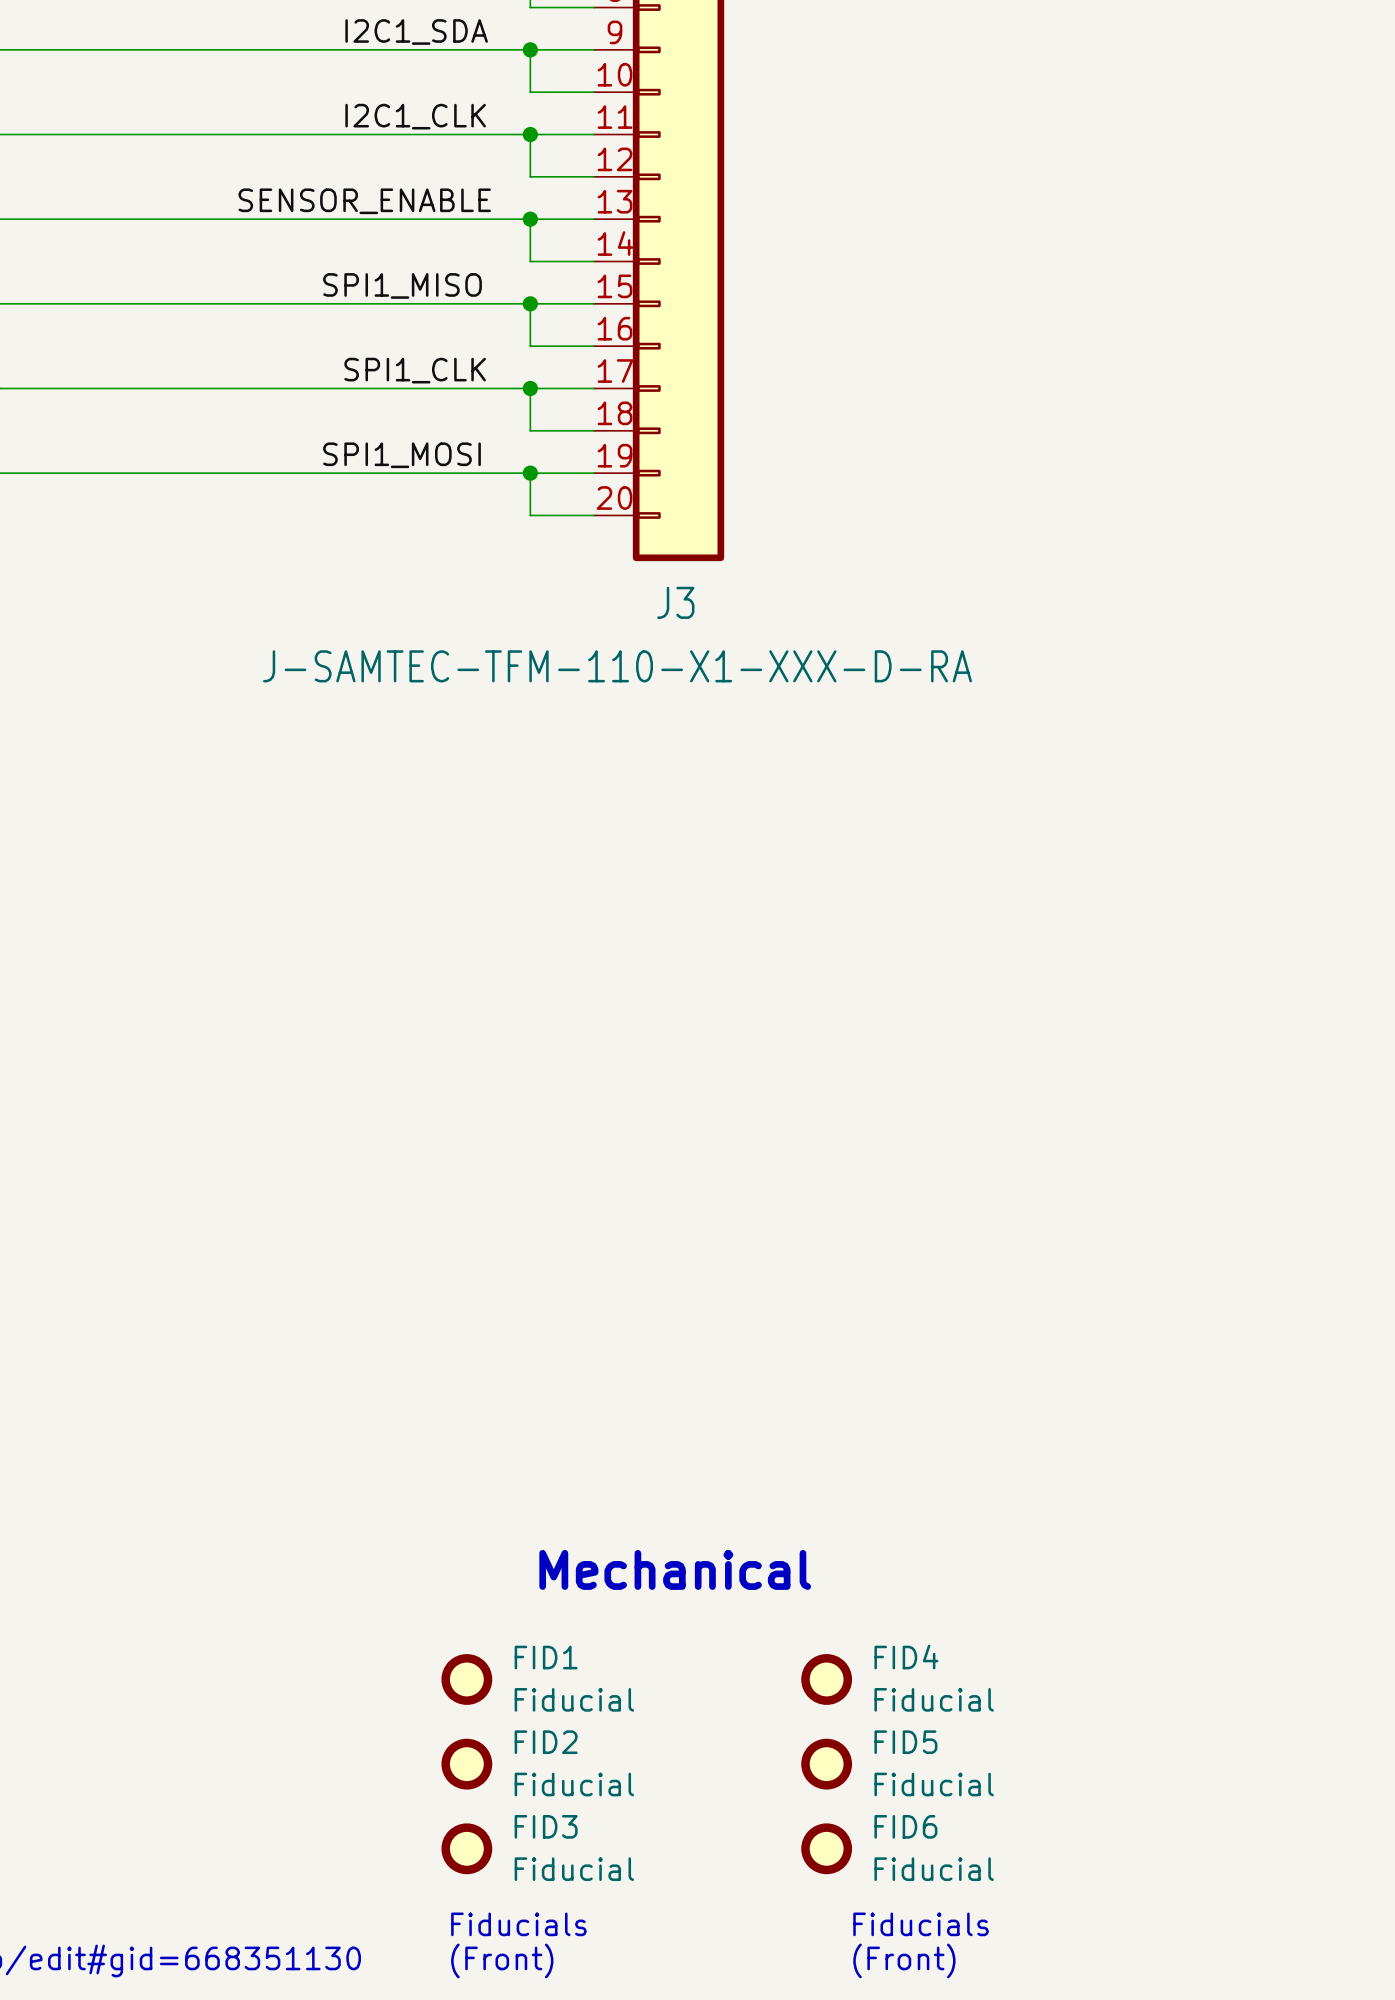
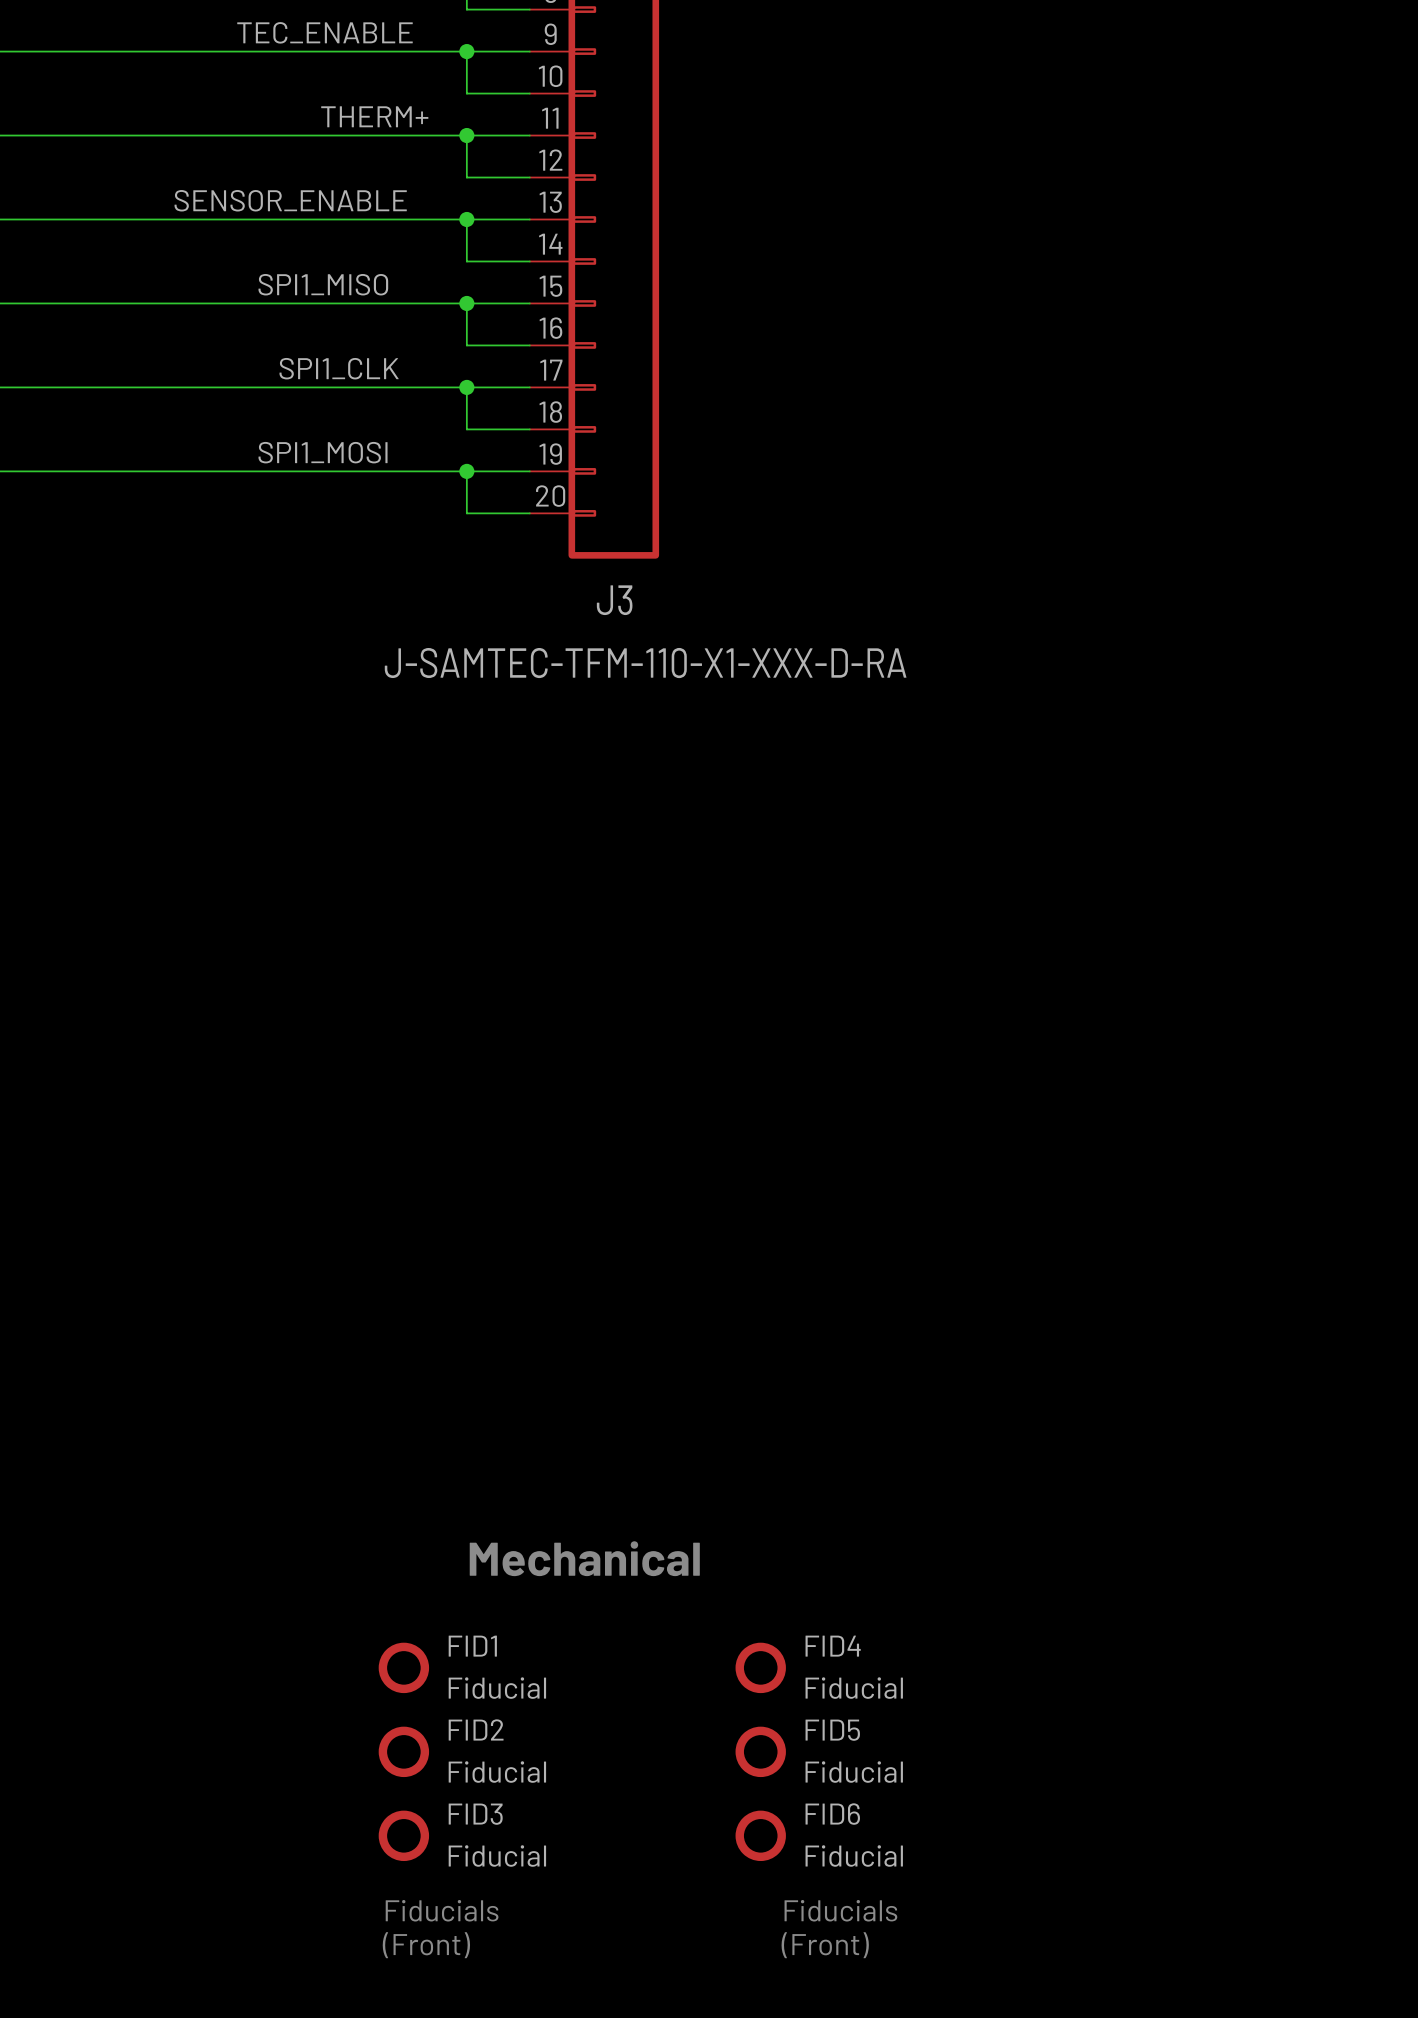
label: none -> TEC_ENABLE (324, 32)
label: I2C1_SDA (416, 31) -> none
label: none -> THERM+ (374, 116)
label: I2C1_CLK (415, 116) -> none

